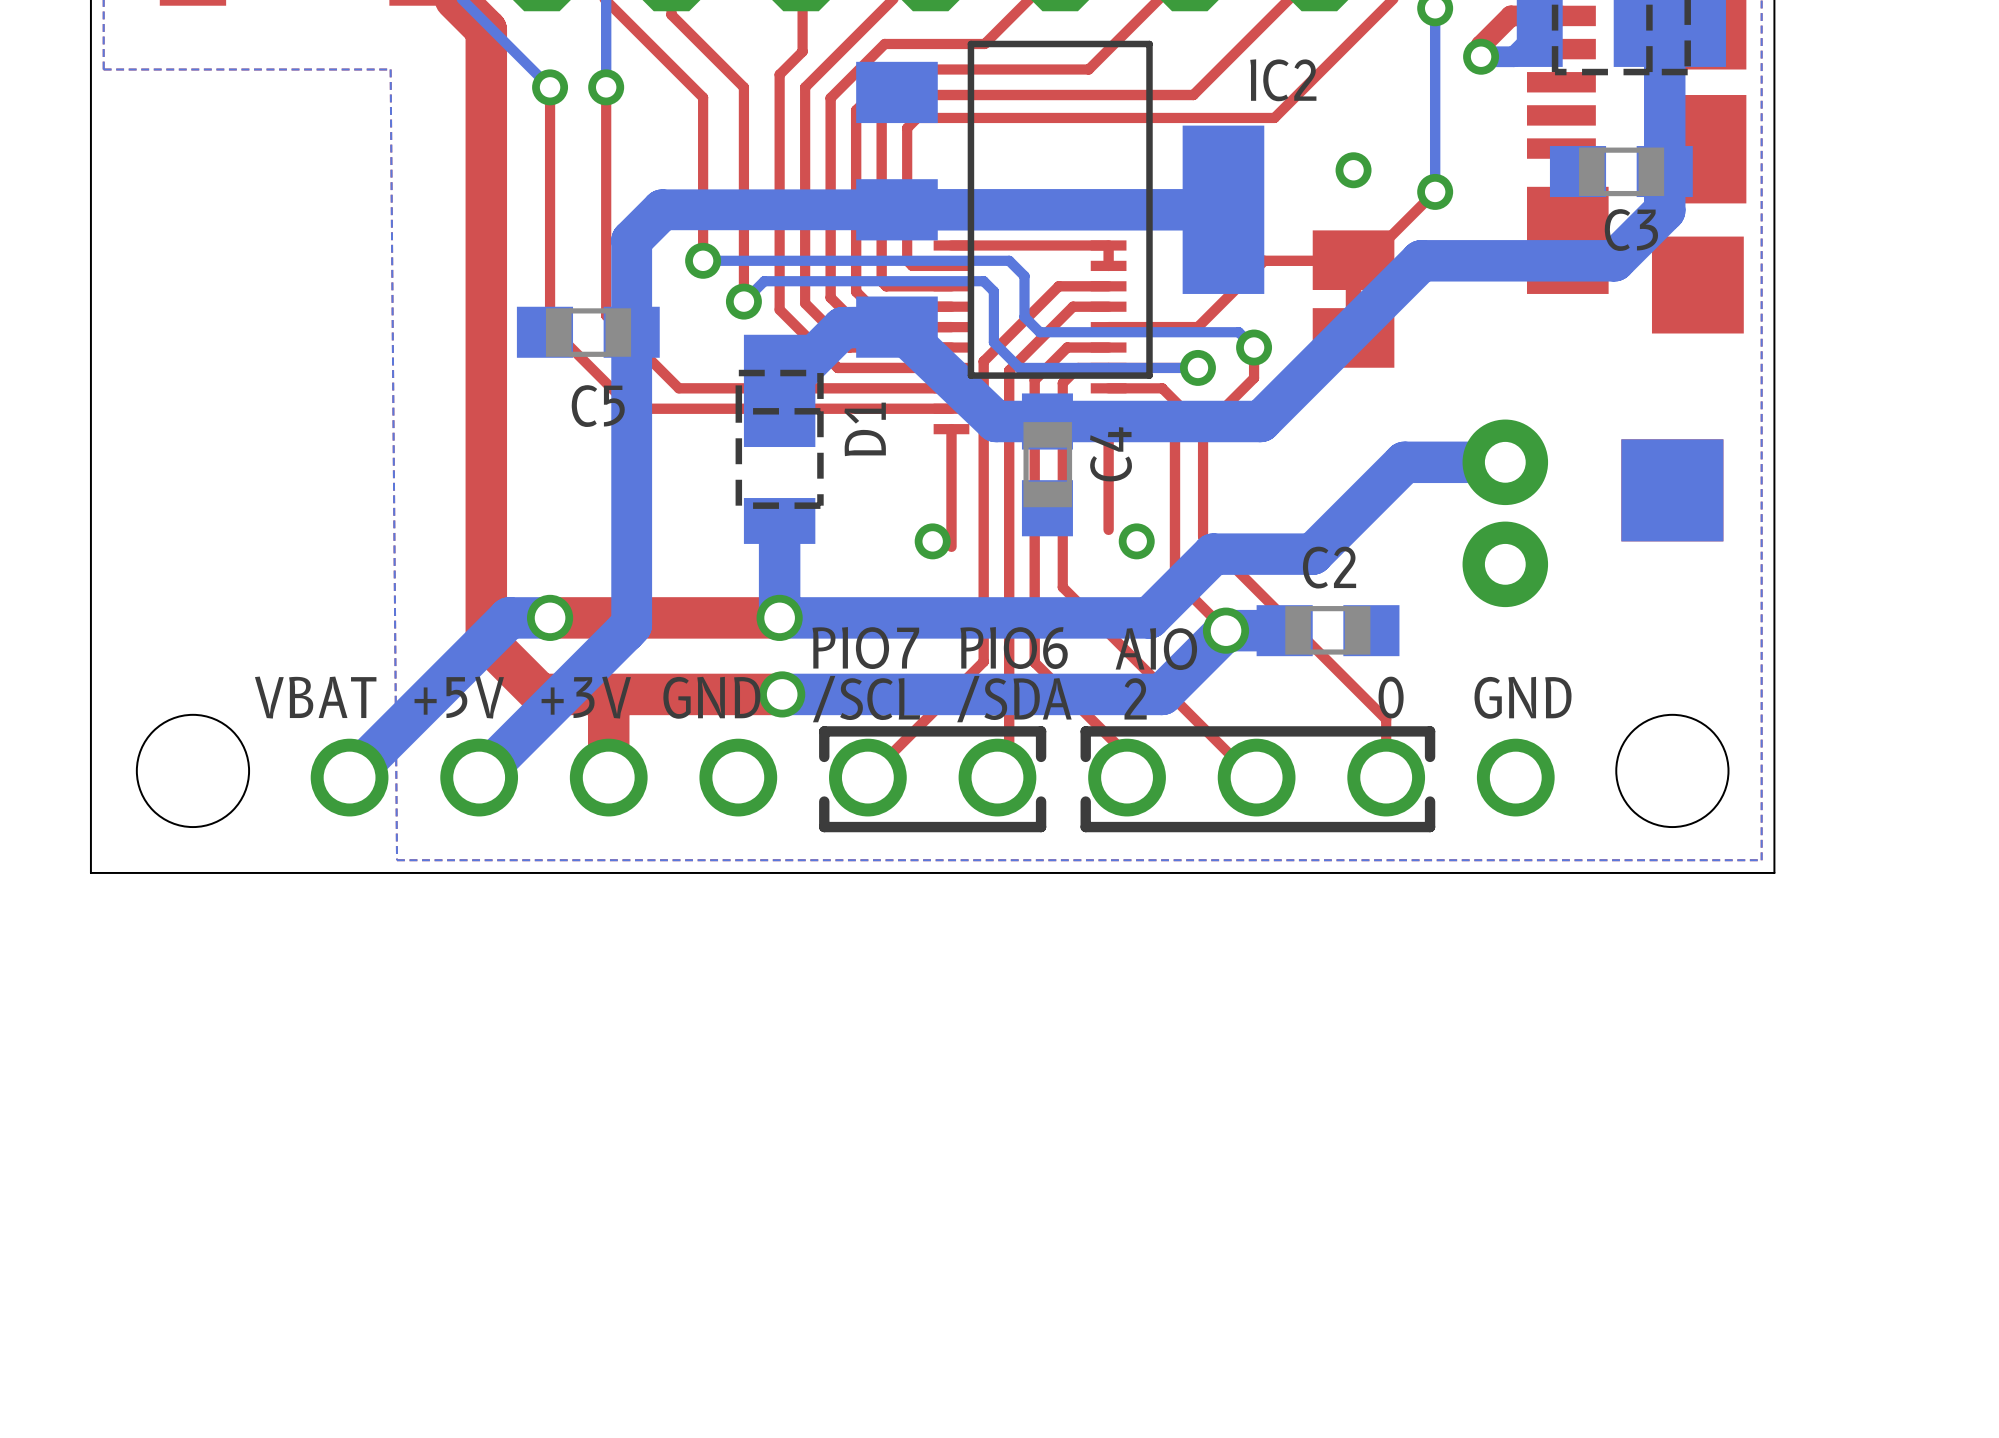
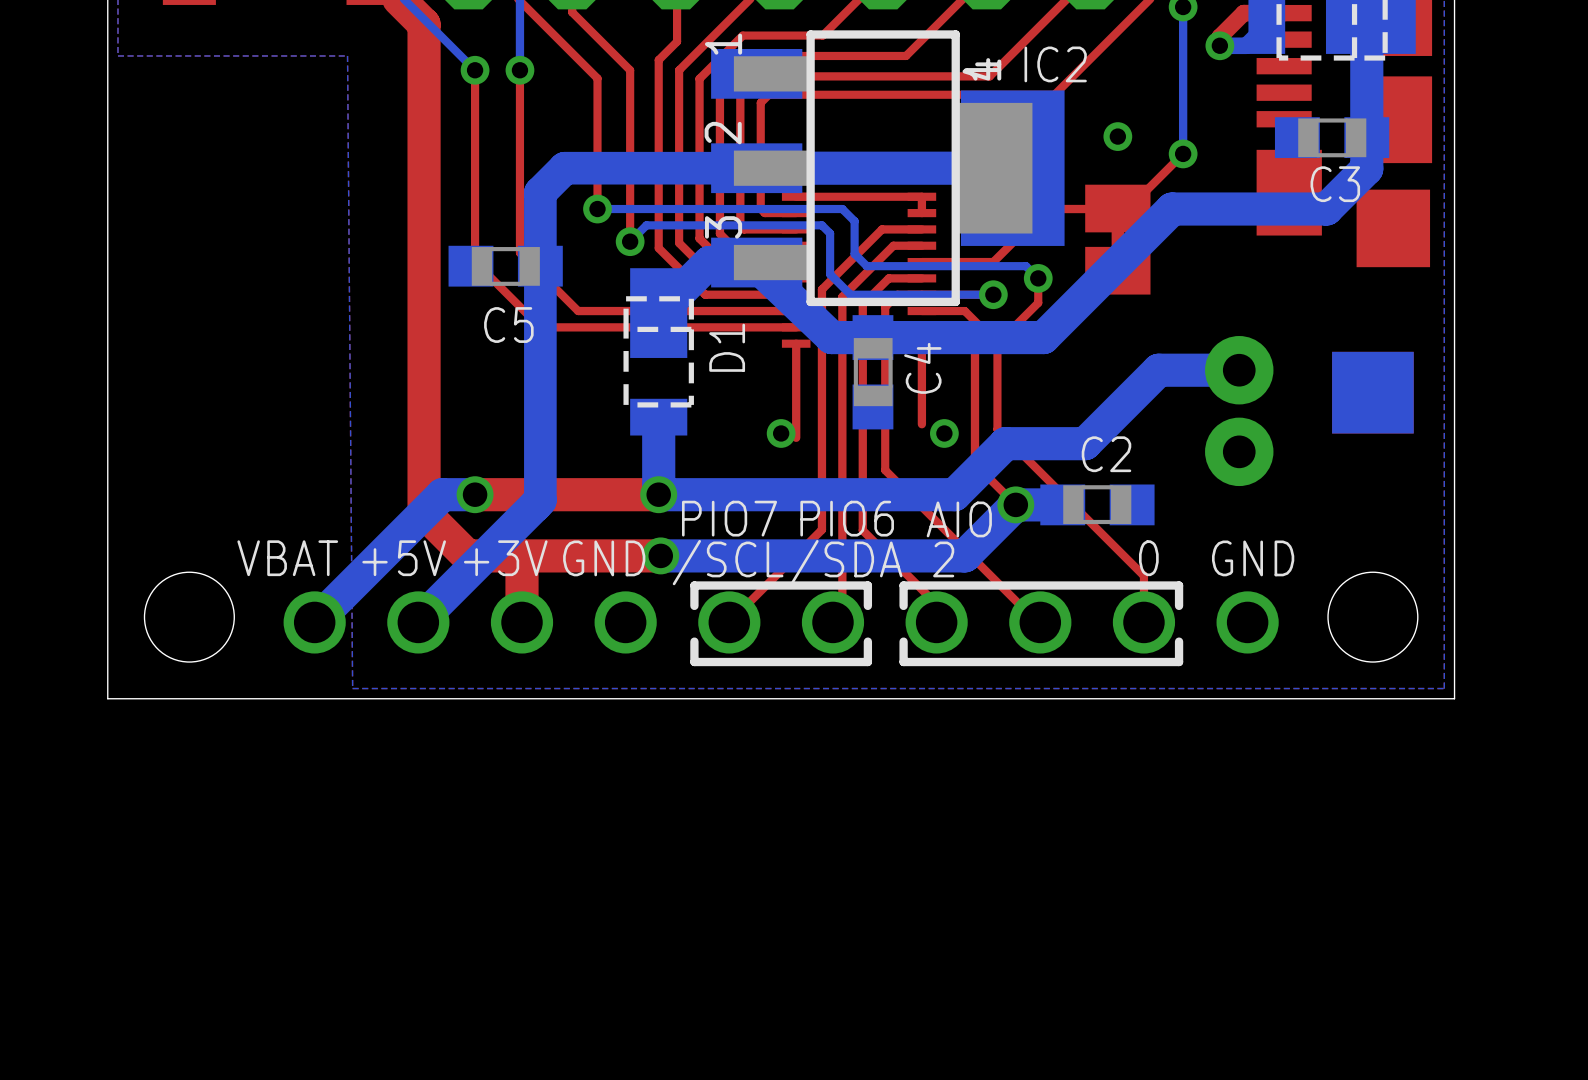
IC2 footprint: [856, 40, 1265, 379] -> [711, 30, 1065, 307]

